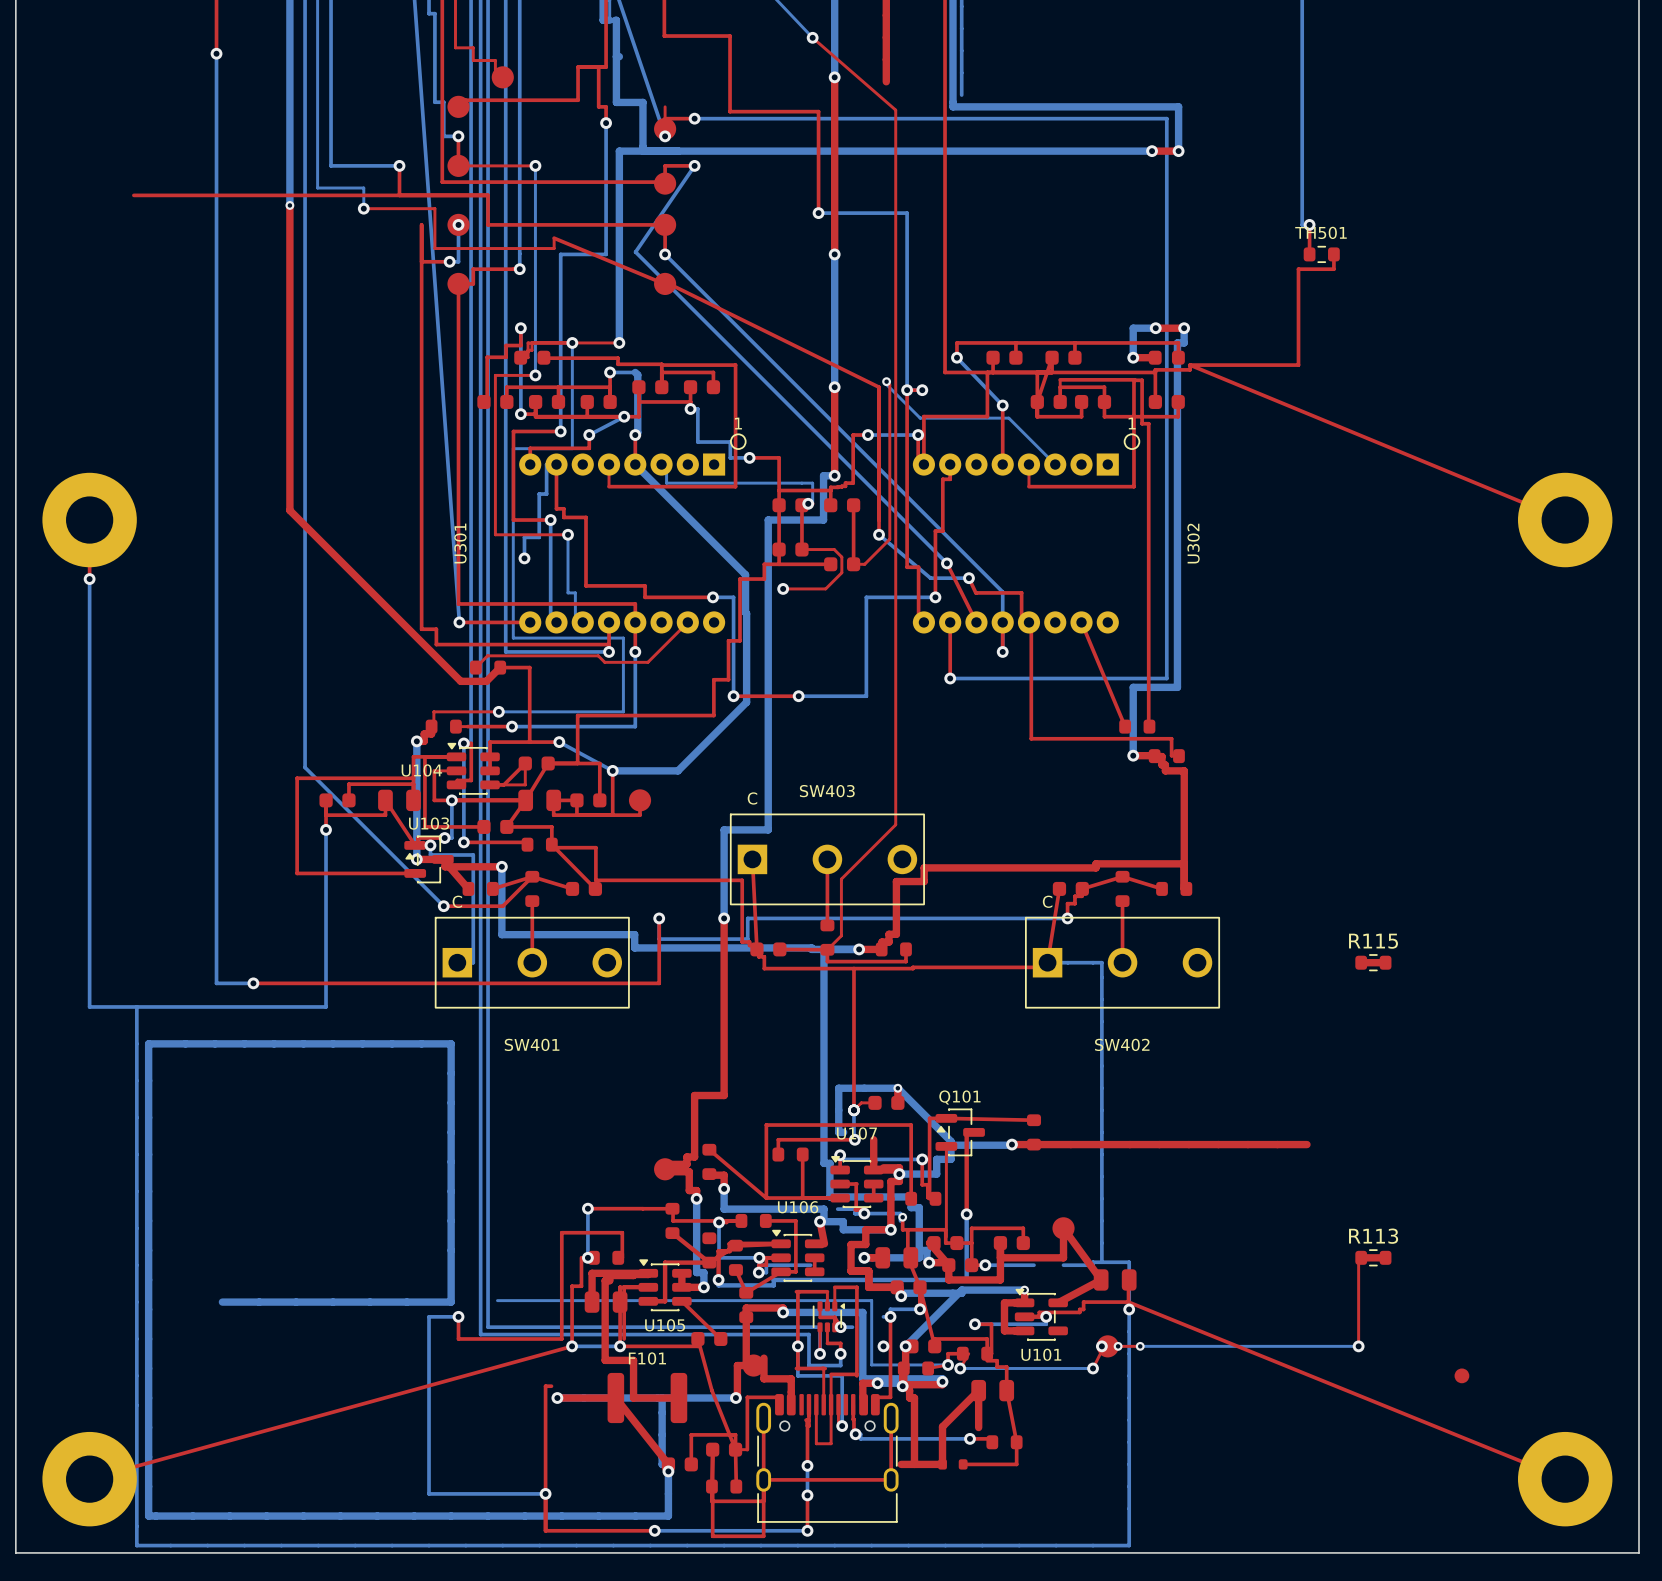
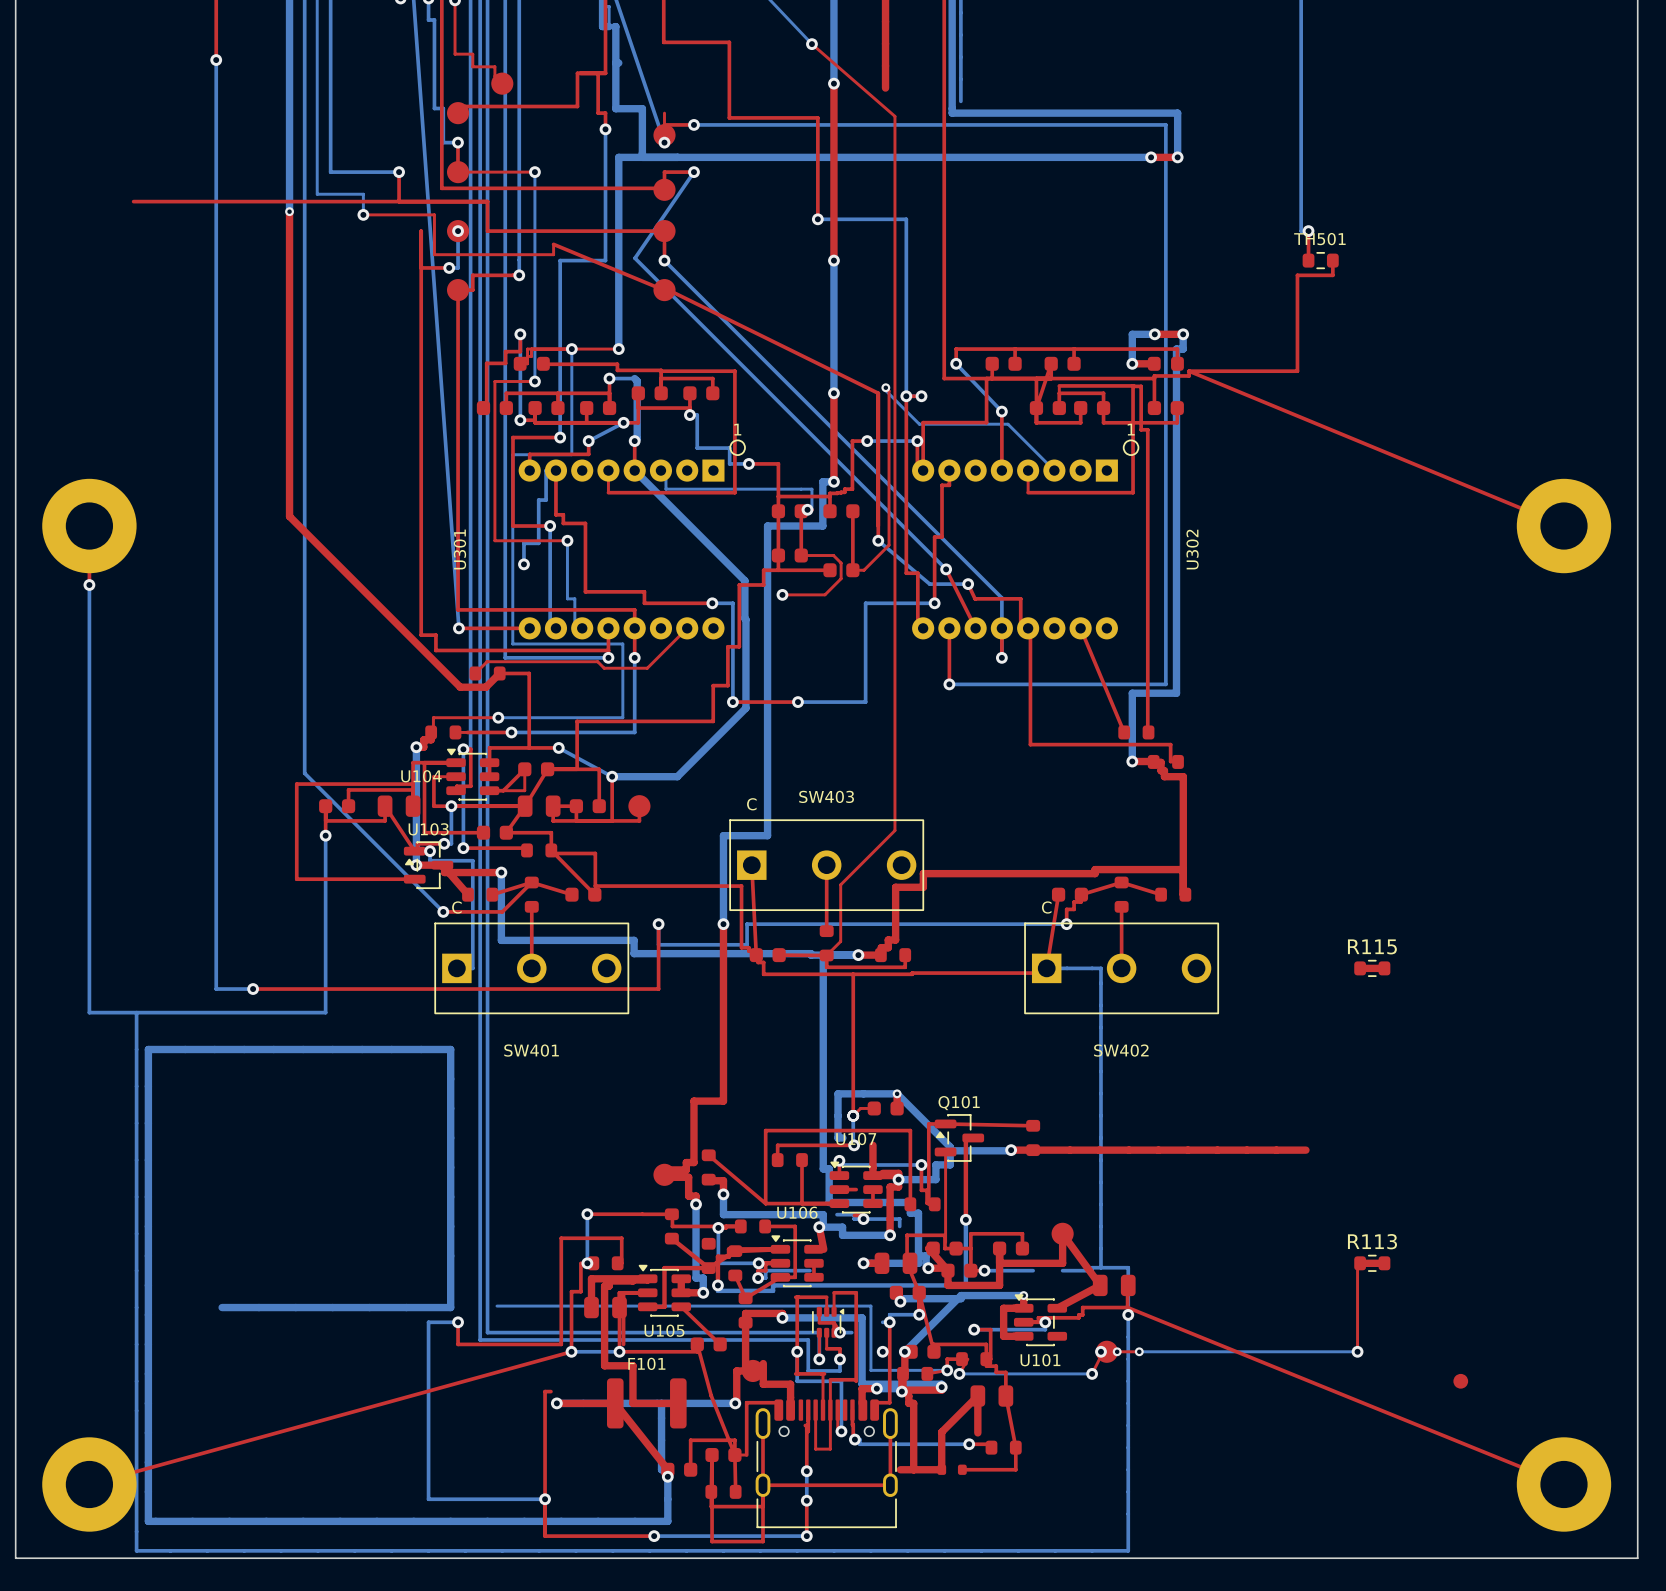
top track: (856, 1184) (856, 1209) -> none
top track: (902, 1217) (902, 1229) (907, 1229) -> none
via: (902, 1217) -> none
top track: (890, 1229) (865, 1229) (865, 1244) (851, 1244) (851, 1271) (868, 1271) (868, 1287) (895, 1287) -> none

